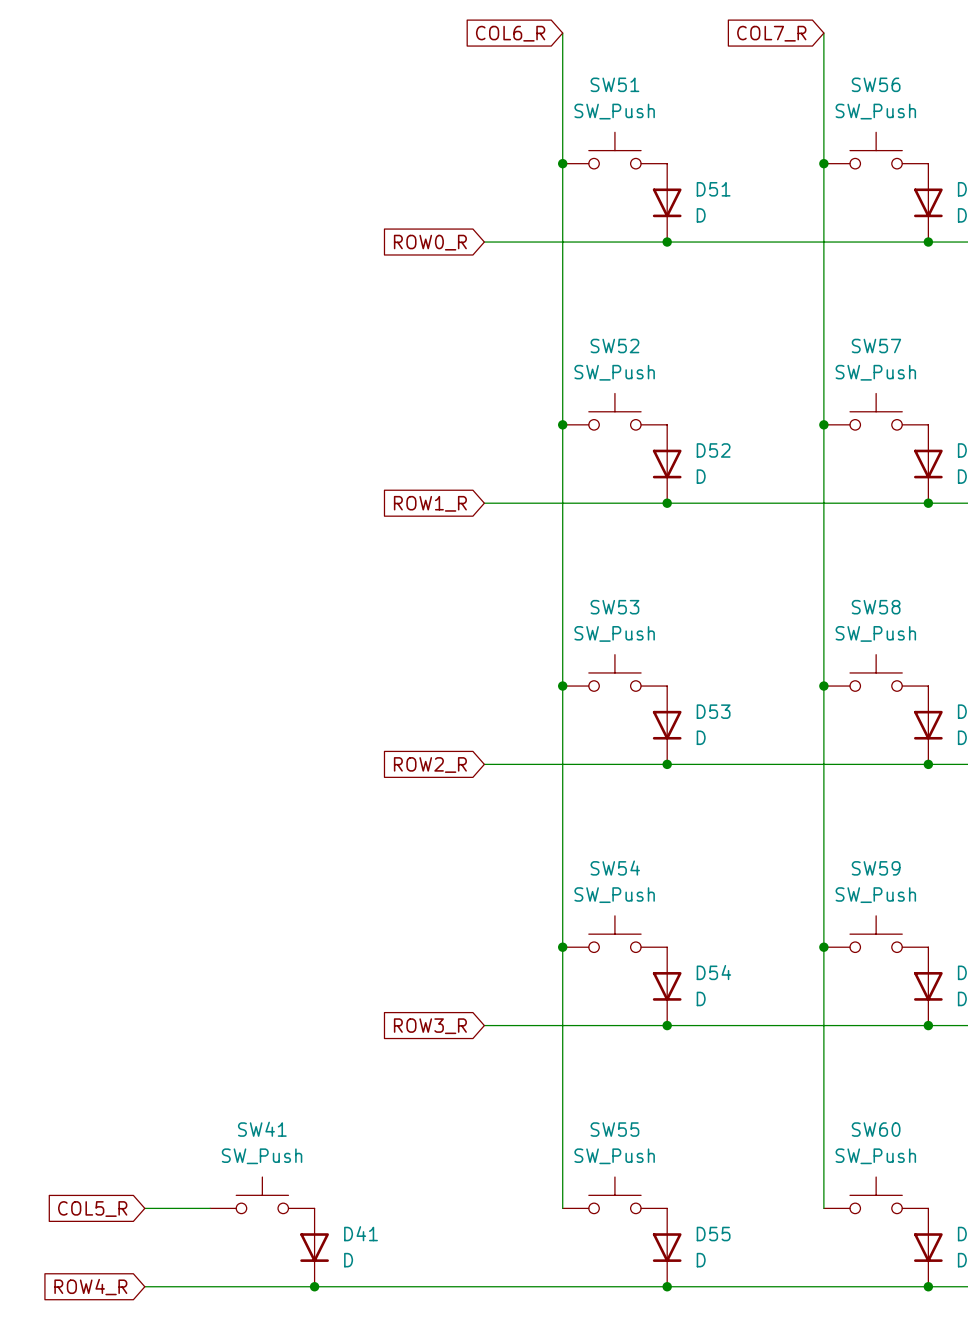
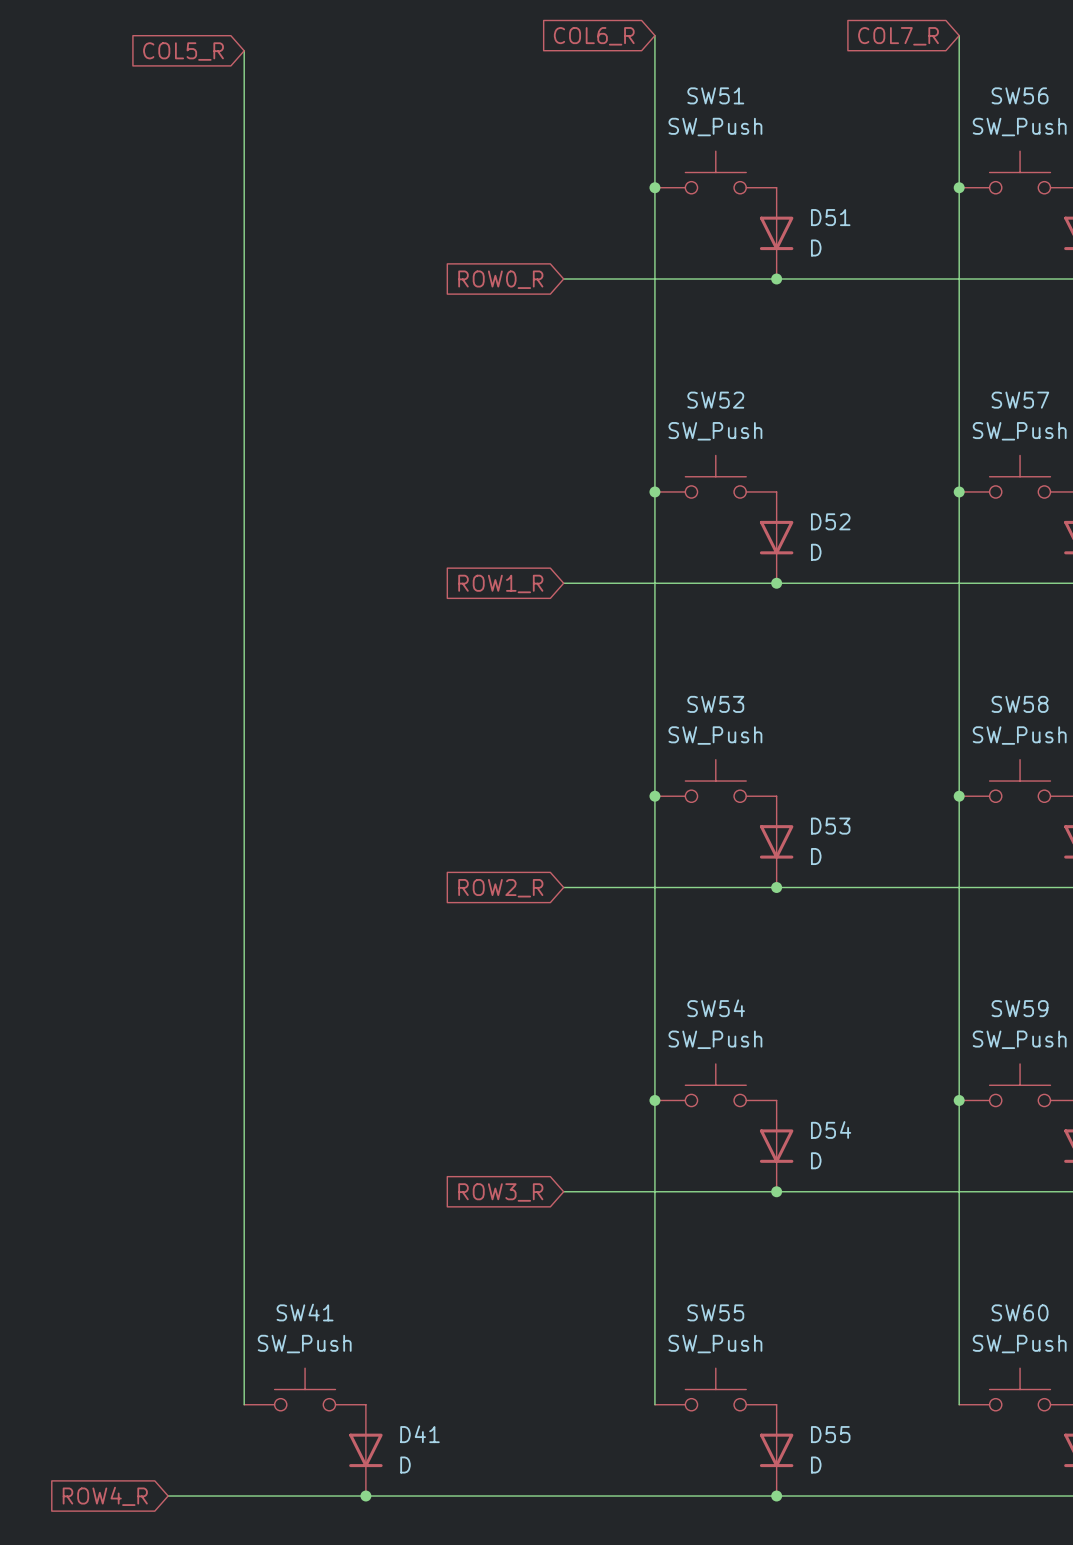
global label: none -> COL5_R (183, 51)
wire: (144, 1208) (210, 1208) -> (244, 50) (244, 1404)
global label: COL5_R (92, 1209) -> none

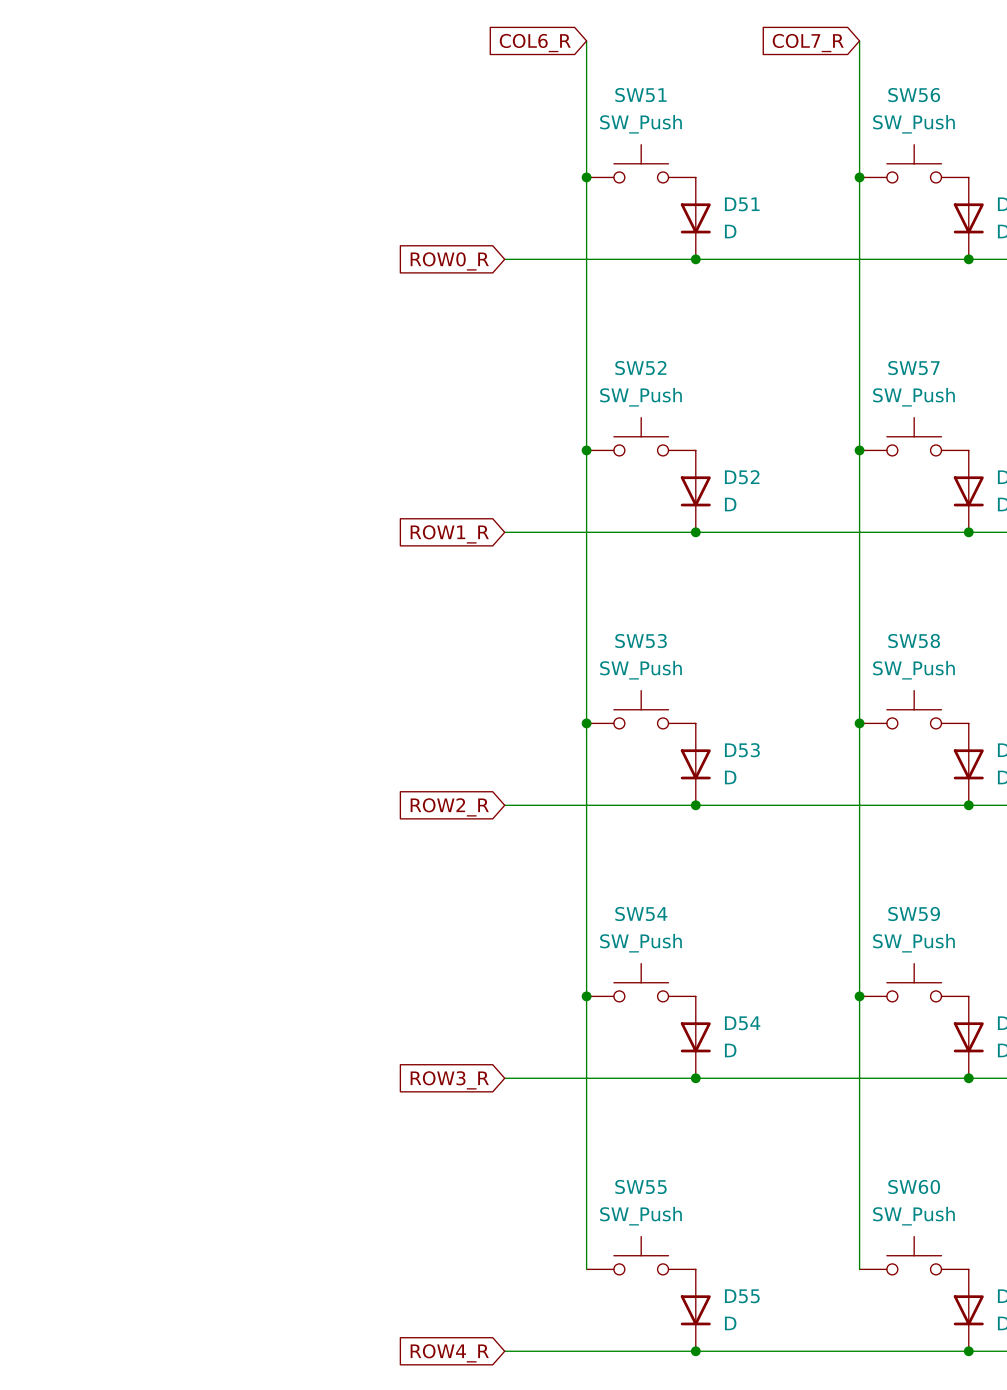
wire: (244, 50) (244, 1404) -> none
global label: COL5_R (183, 51) -> none
SW41: SW_Push (305, 1389) -> none
D41: D (365, 1450) -> none
global label: ROW4_R (105, 1496) -> none
wire: (168, 1496) (563, 1496) -> none
junction: (365, 1496) -> none
global label: none -> ROW4_R (449, 1353)

